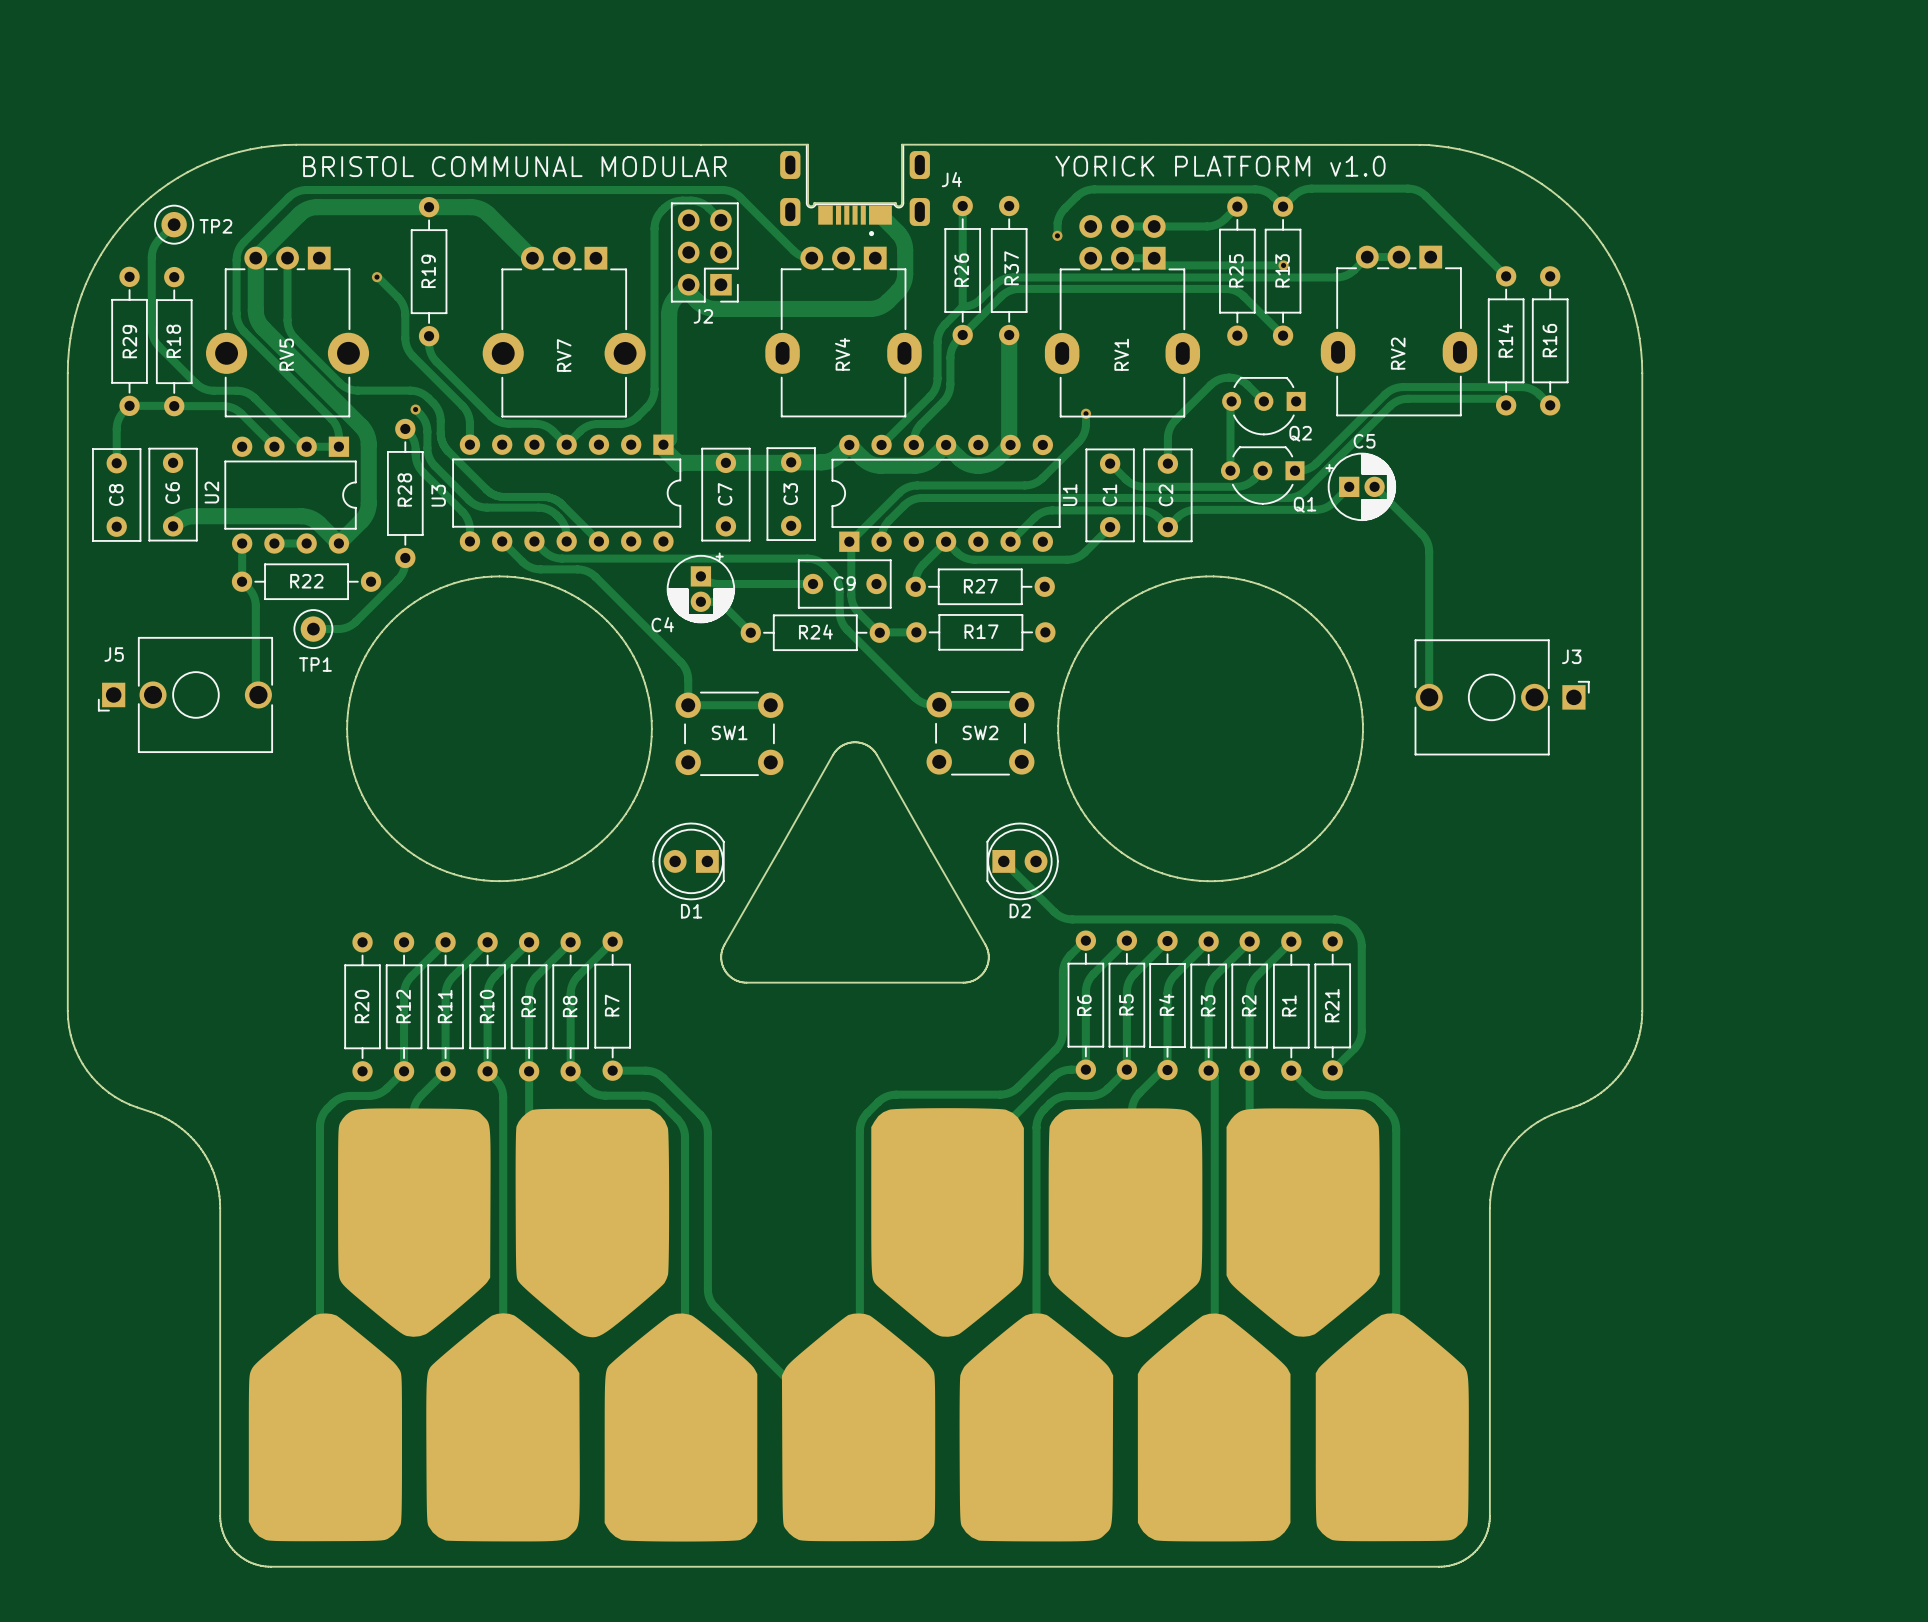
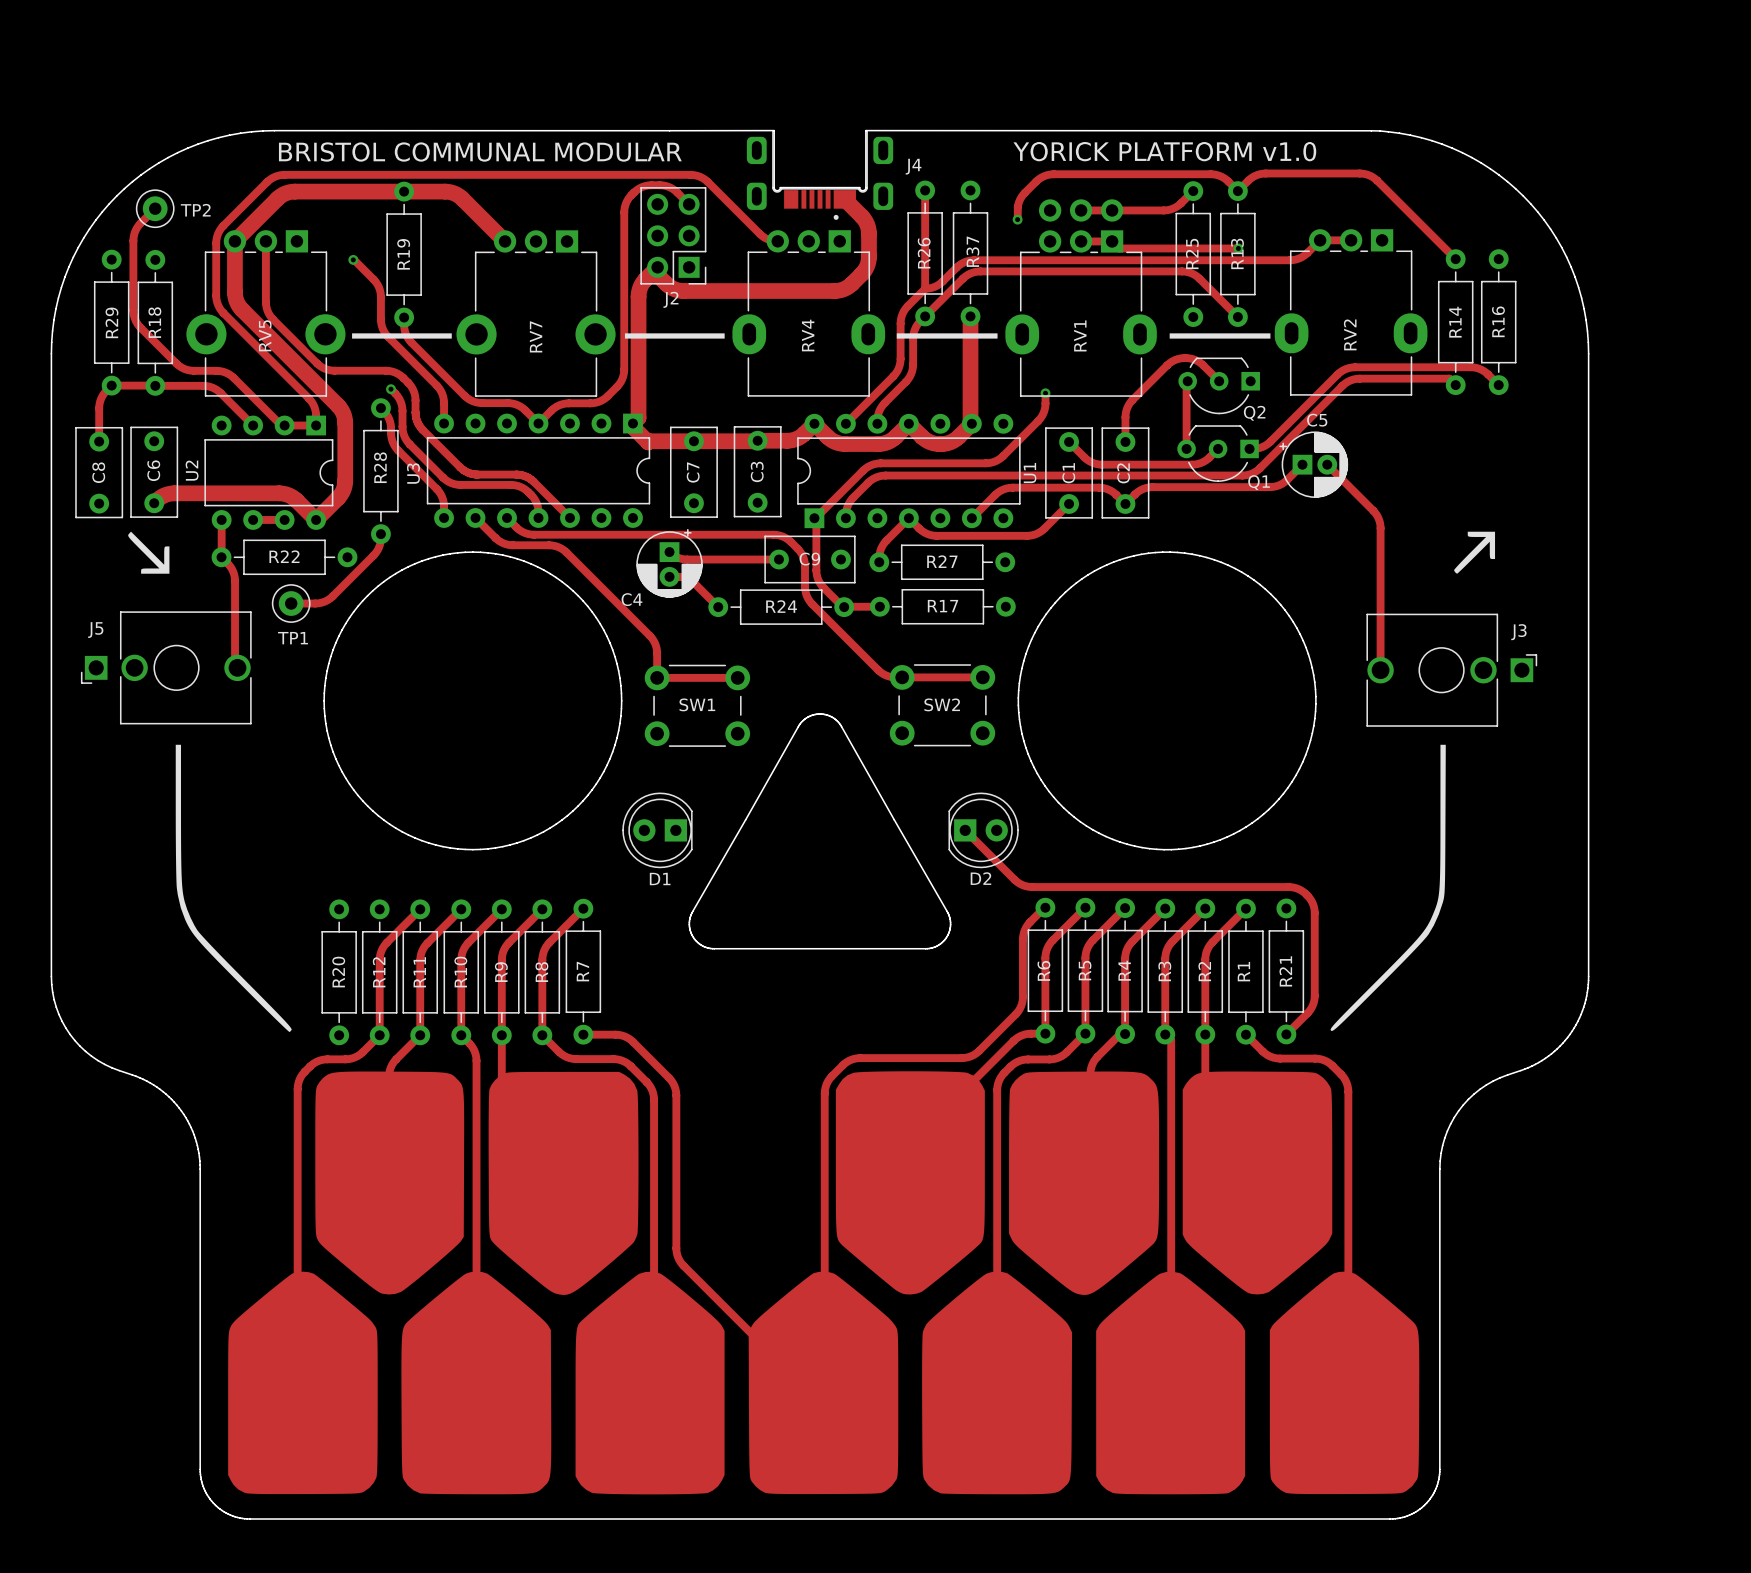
drawing: none -> [128, 333, 1496, 1033]

